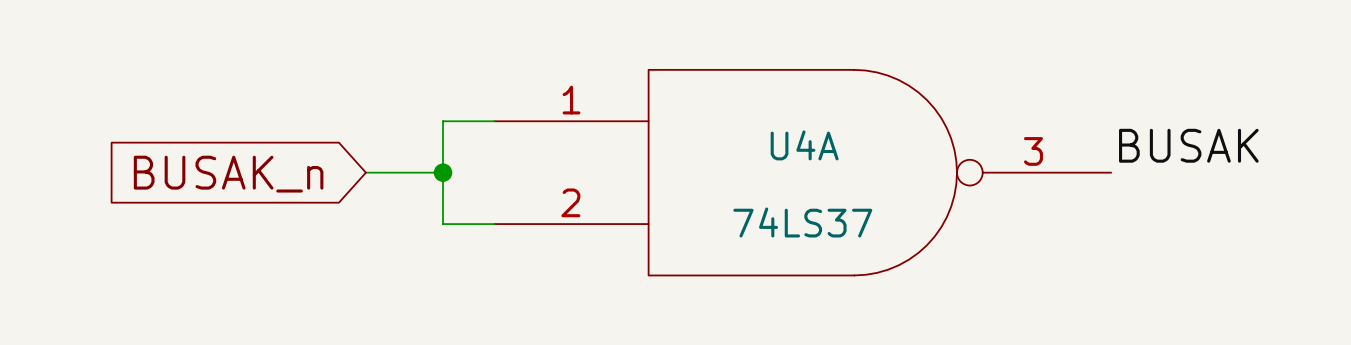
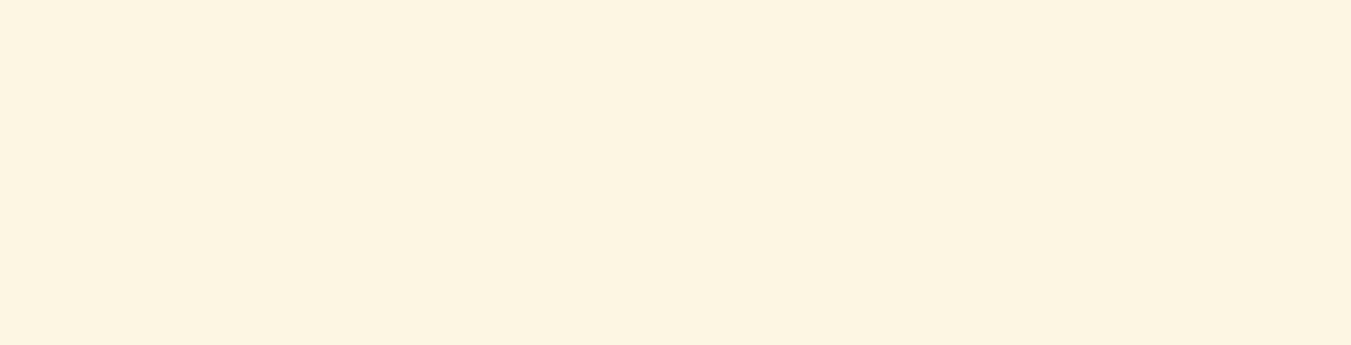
wire: (494, 121) (443, 121) (443, 224) (494, 224) -> none
label: BUSAK (1188, 145) -> none
wire: (365, 172) (443, 172) -> none
junction: (443, 172) -> none
U4A: 74LS37 (802, 172) -> none
global label: BUSAK_n (228, 174) -> none

